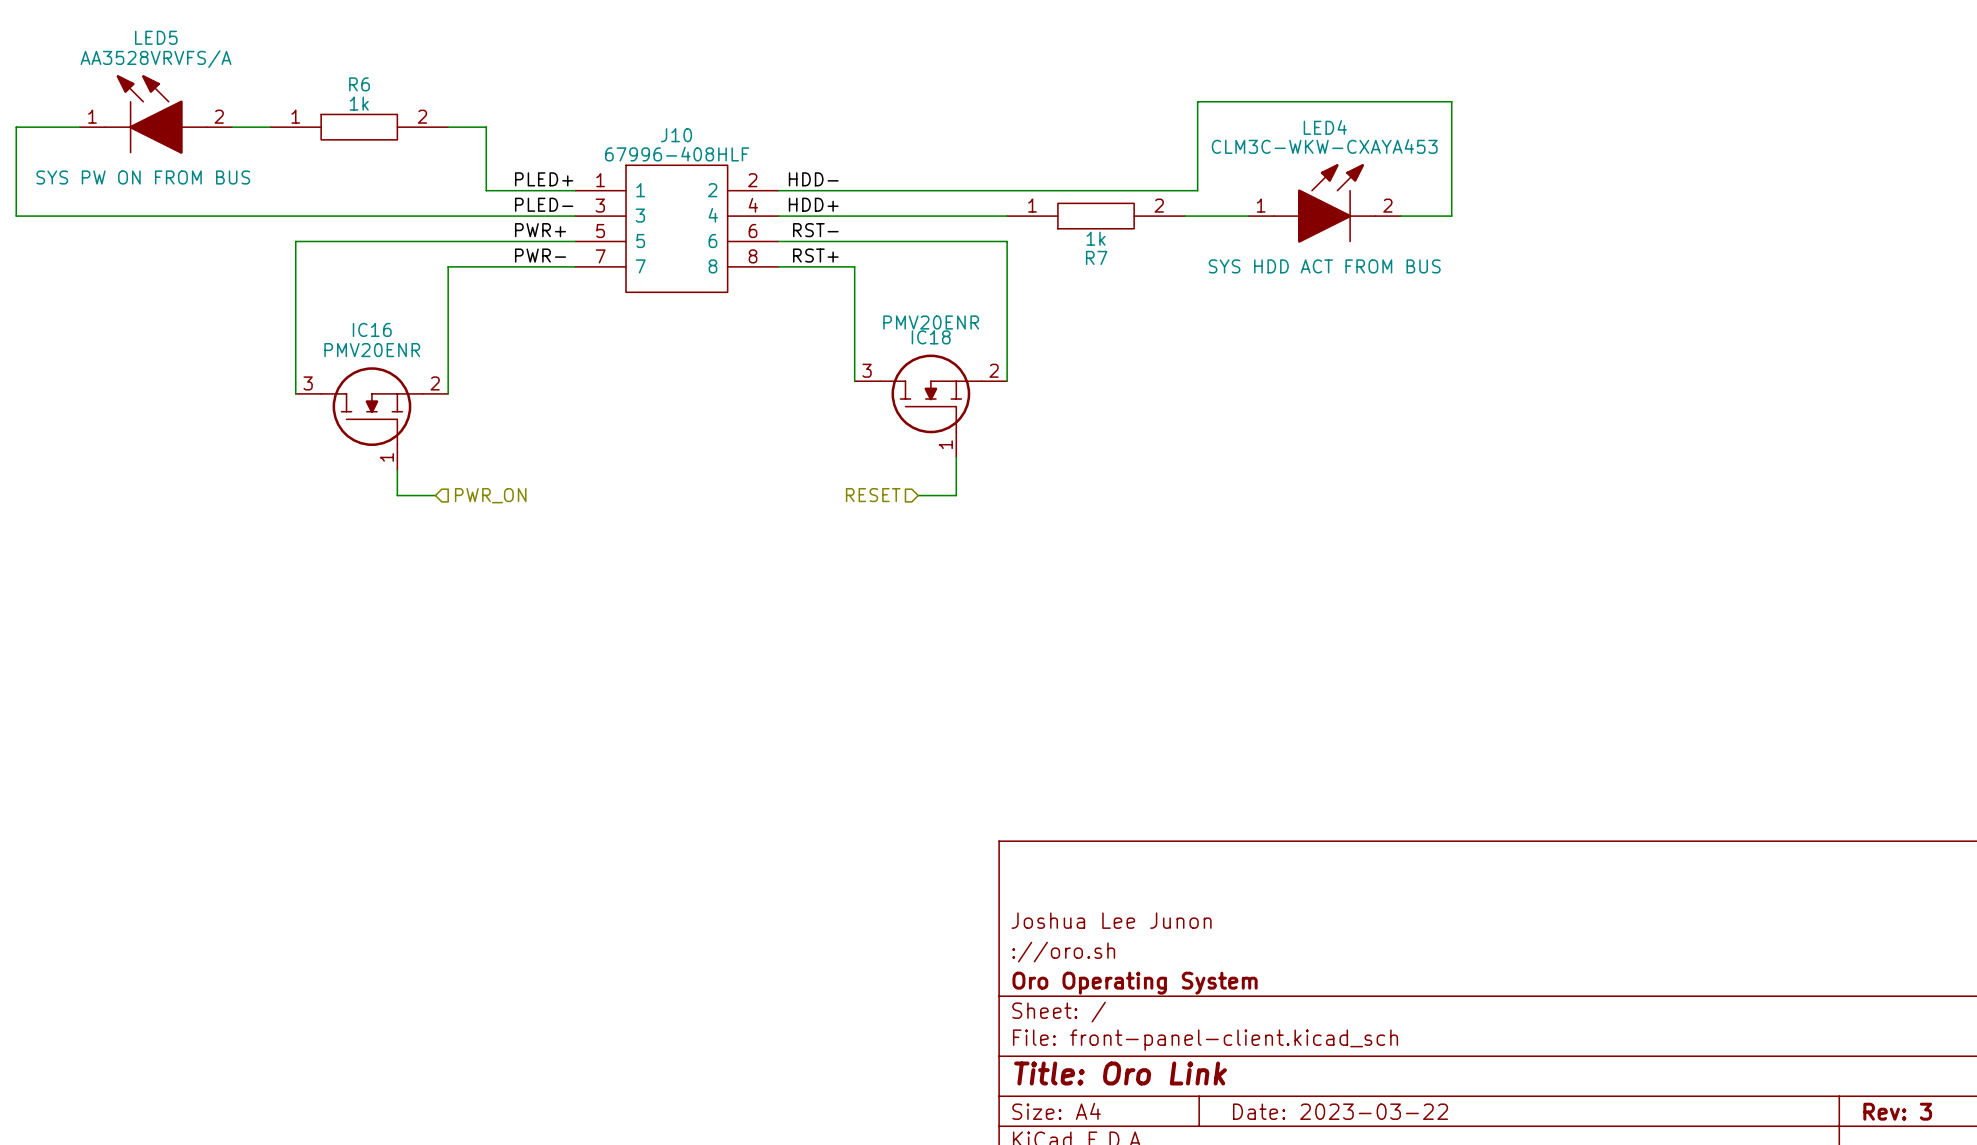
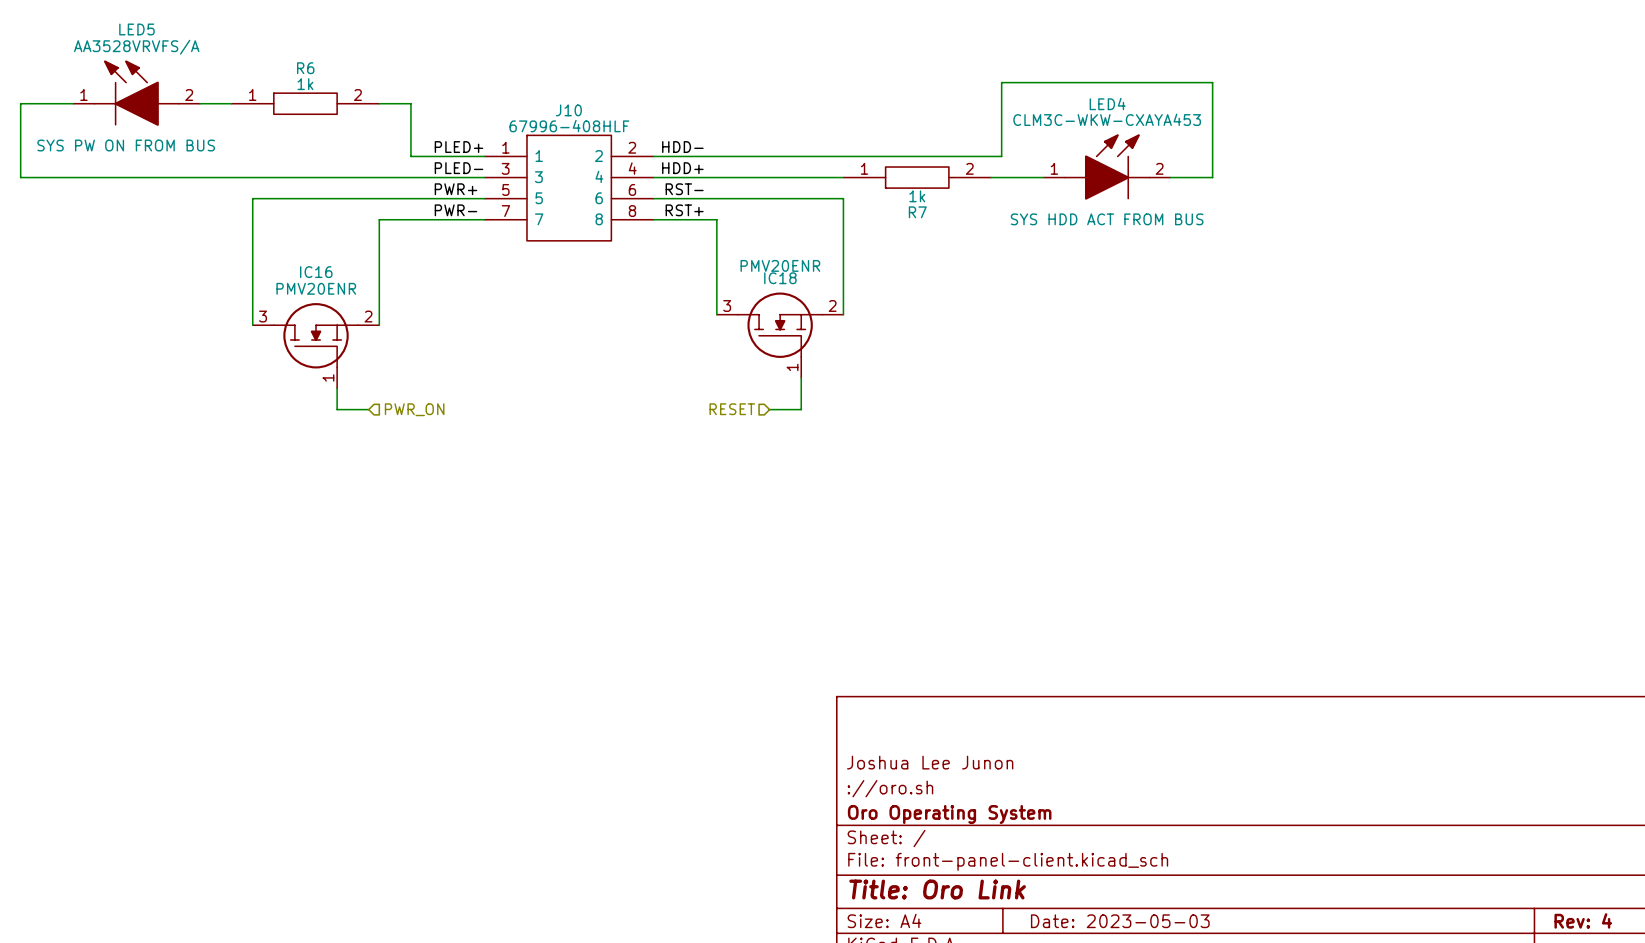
title block: Date: 2023-03-22 (1340, 1111) -> Date: 2023-05-03 (1120, 921)
title block: Rev: 3 (1897, 1111) -> Rev: 4 (1583, 920)

